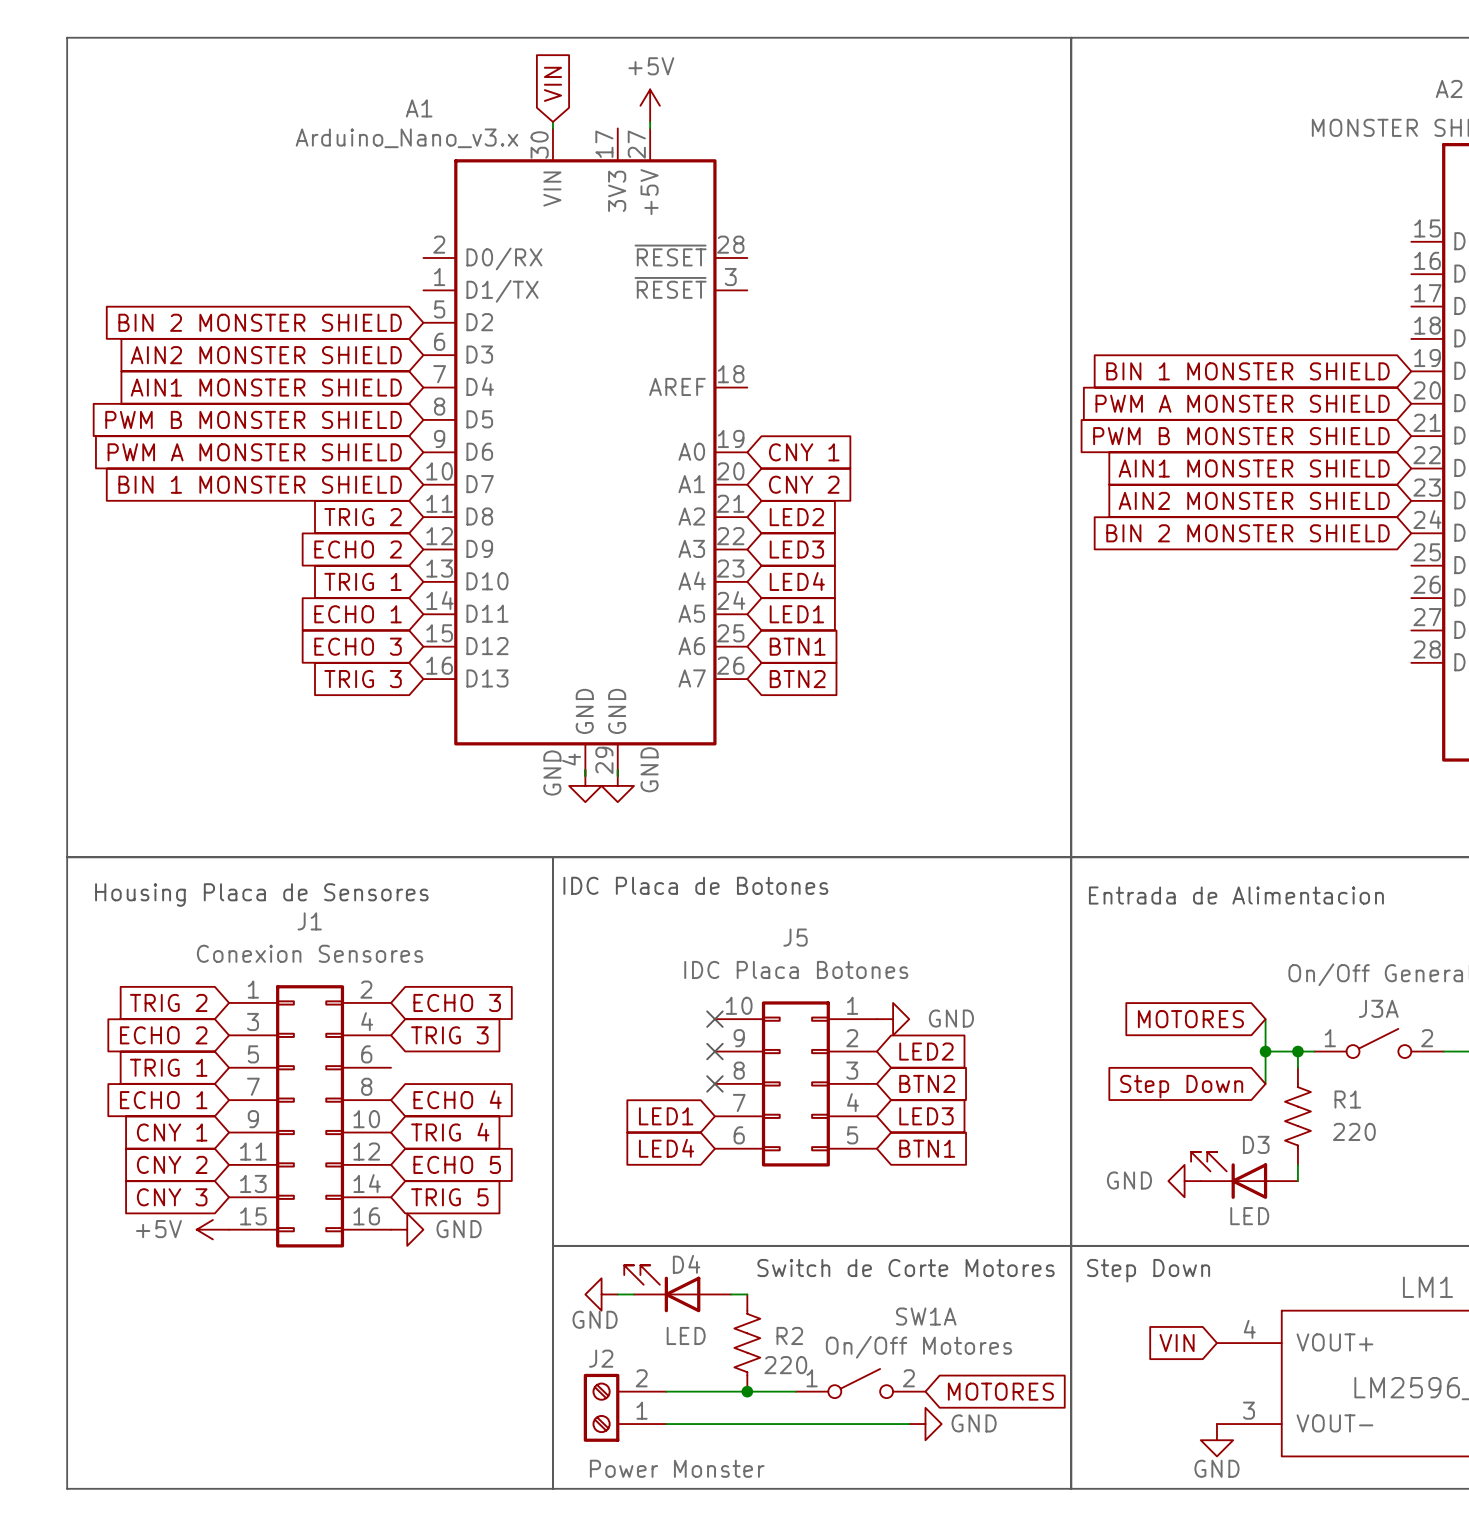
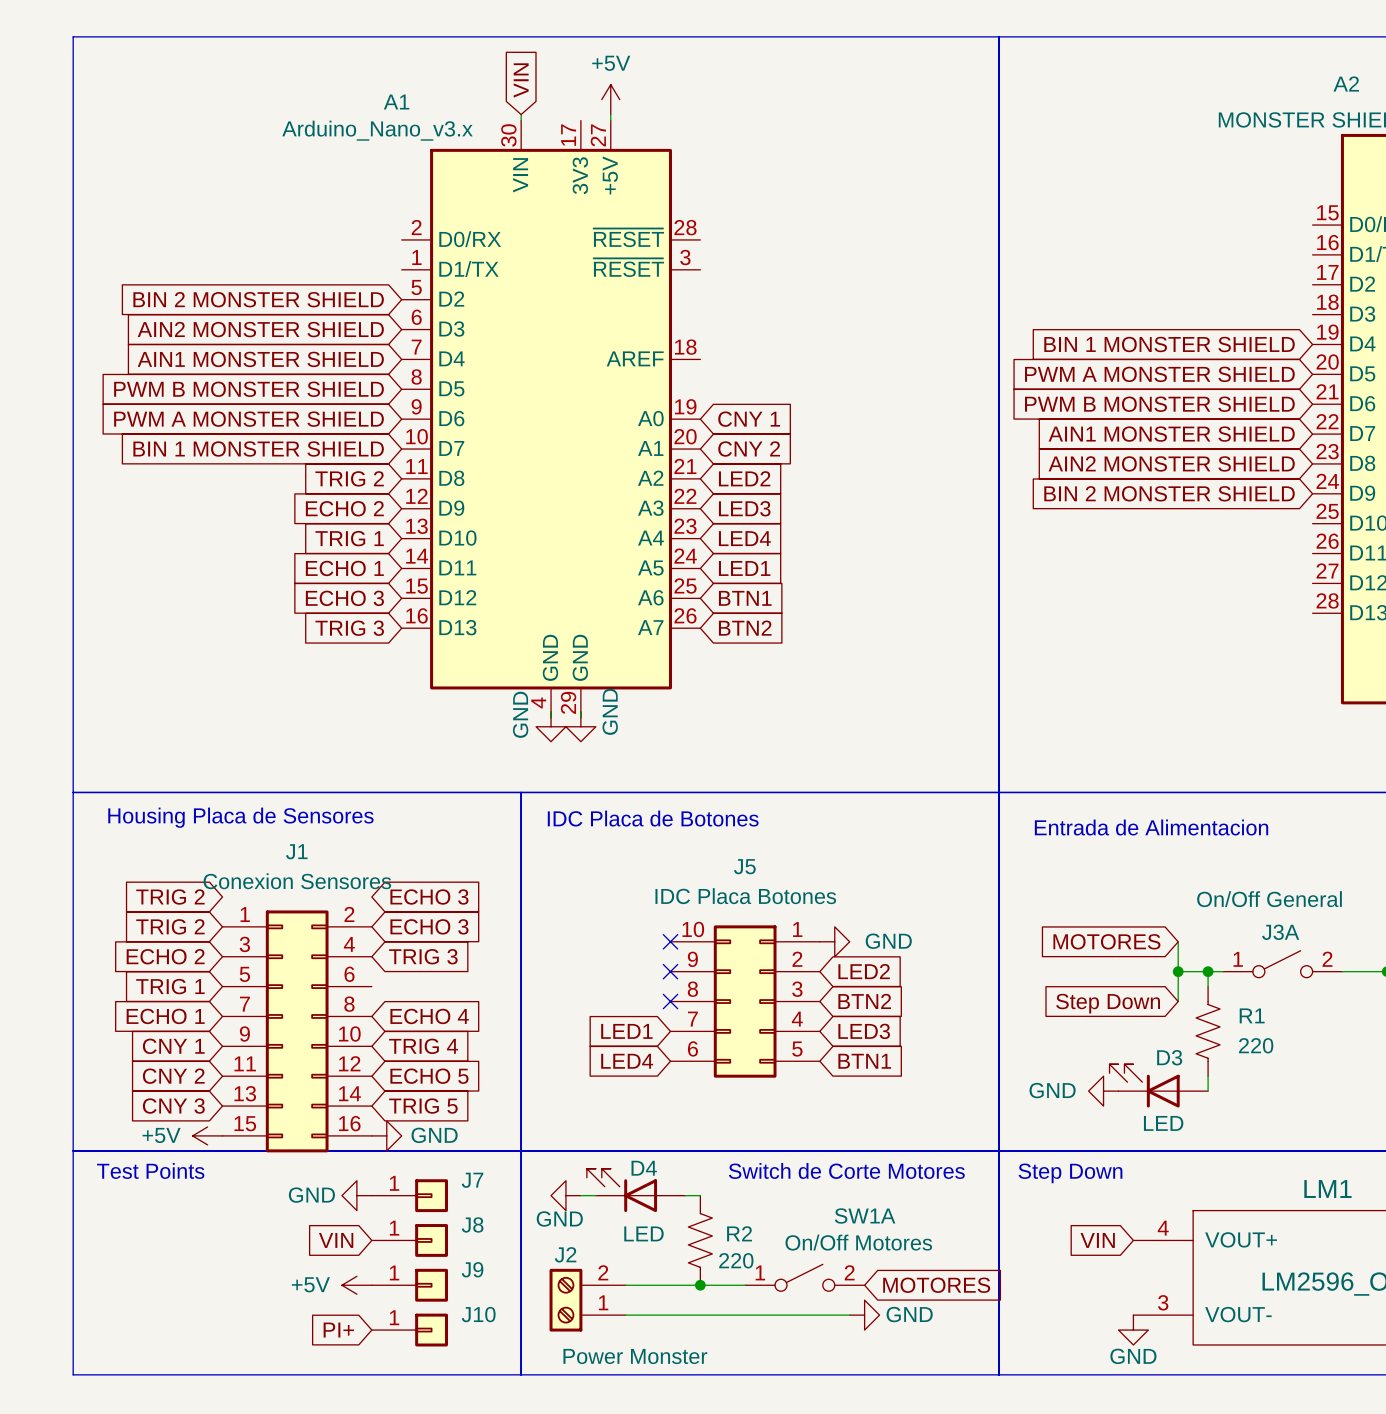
text position: Housing Placa de Sensores (261, 894) -> Housing Placa de Sensores (240, 817)
global label: none -> TRIG 2 (170, 897)
global label: none -> ECHO 3 (429, 897)
line: none -> (73, 1150) (521, 1150)
text: none -> Test Points (150, 1170)
power symbol: none -> GND (356, 1195)
J7: none -> (409, 1195)
global label: none -> VIN (336, 1240)
J8: none -> (409, 1240)
power symbol: none -> +5V (356, 1285)
J9: none -> (409, 1285)
global label: none -> PI+ (338, 1330)
J10: none -> (409, 1330)

